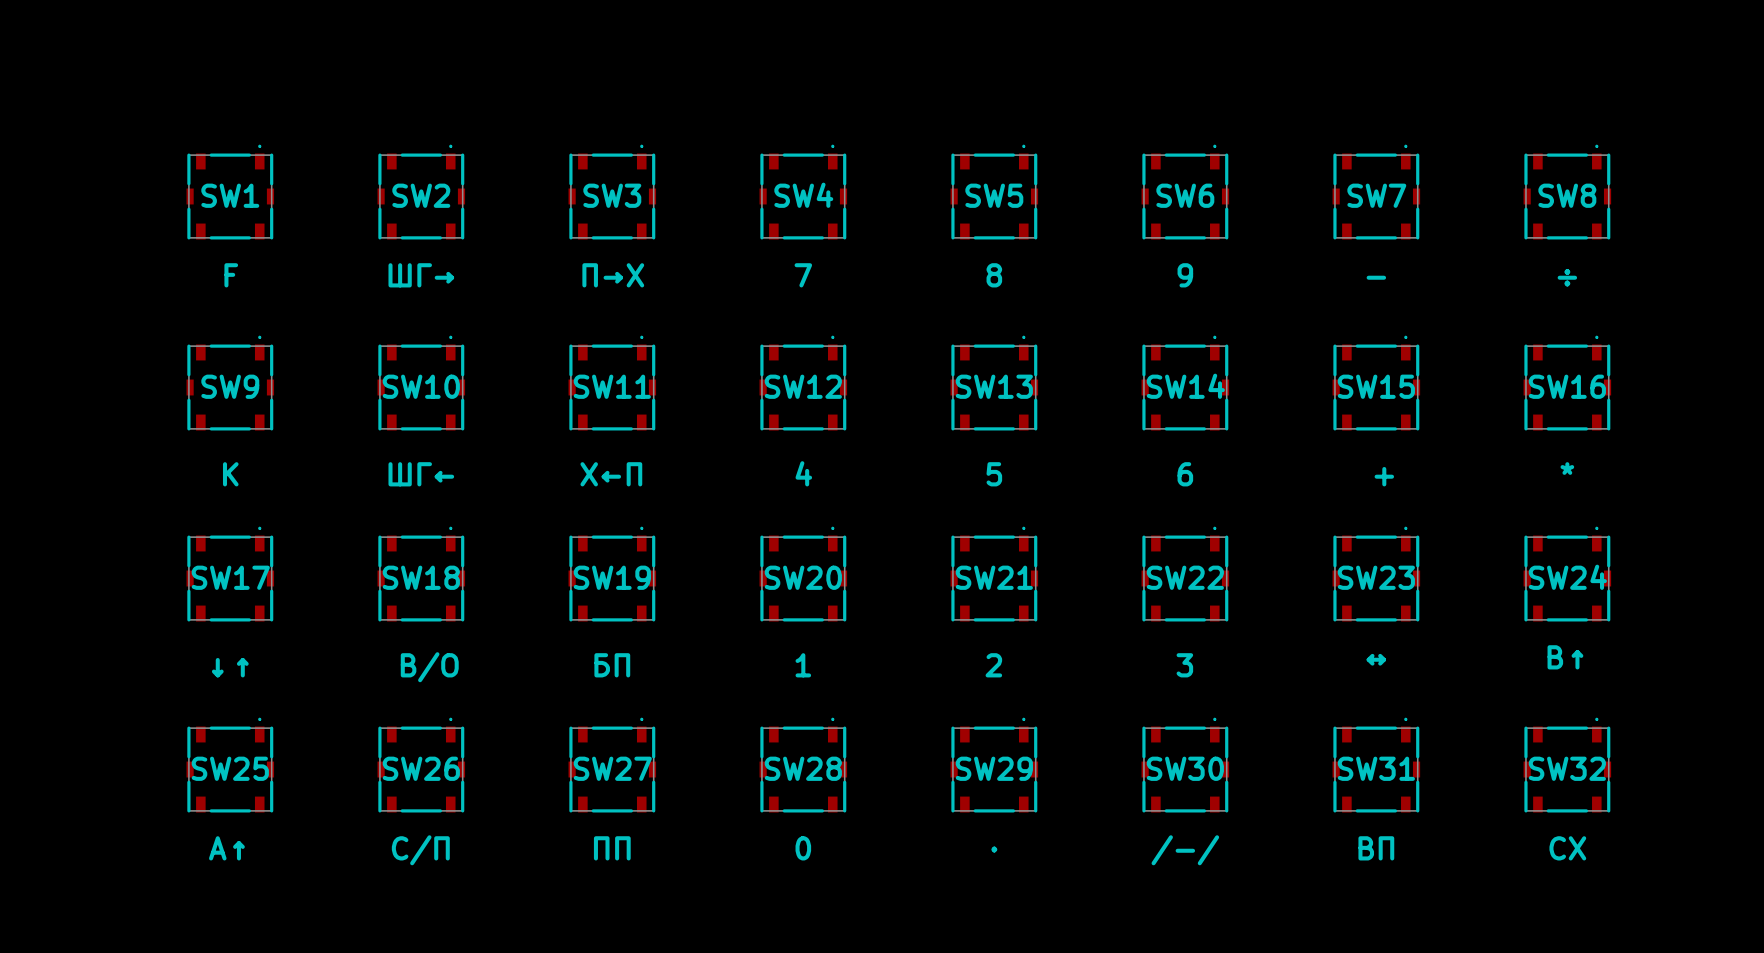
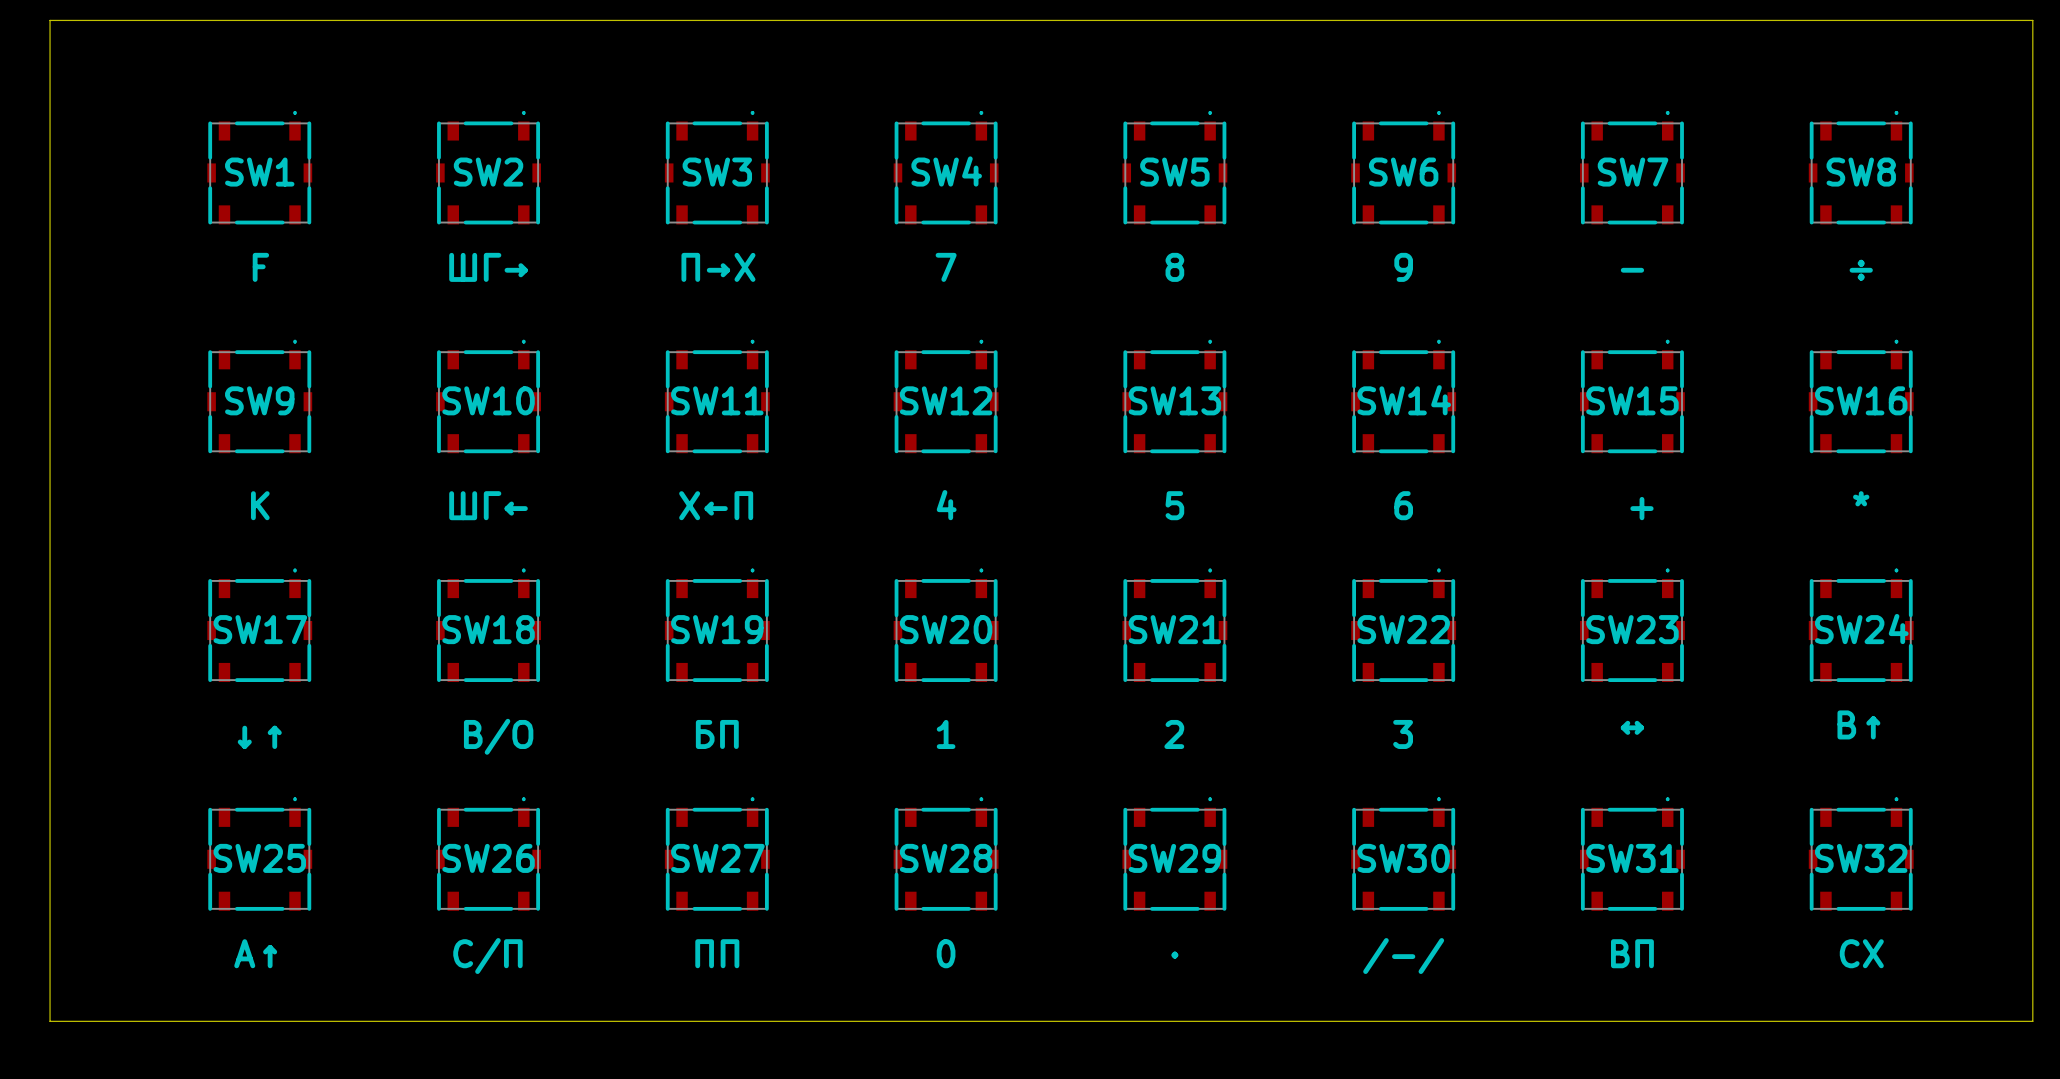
board edge: none -> (50, 20) (2032, 20) (2032, 1021) (50, 1021) (50, 20)

